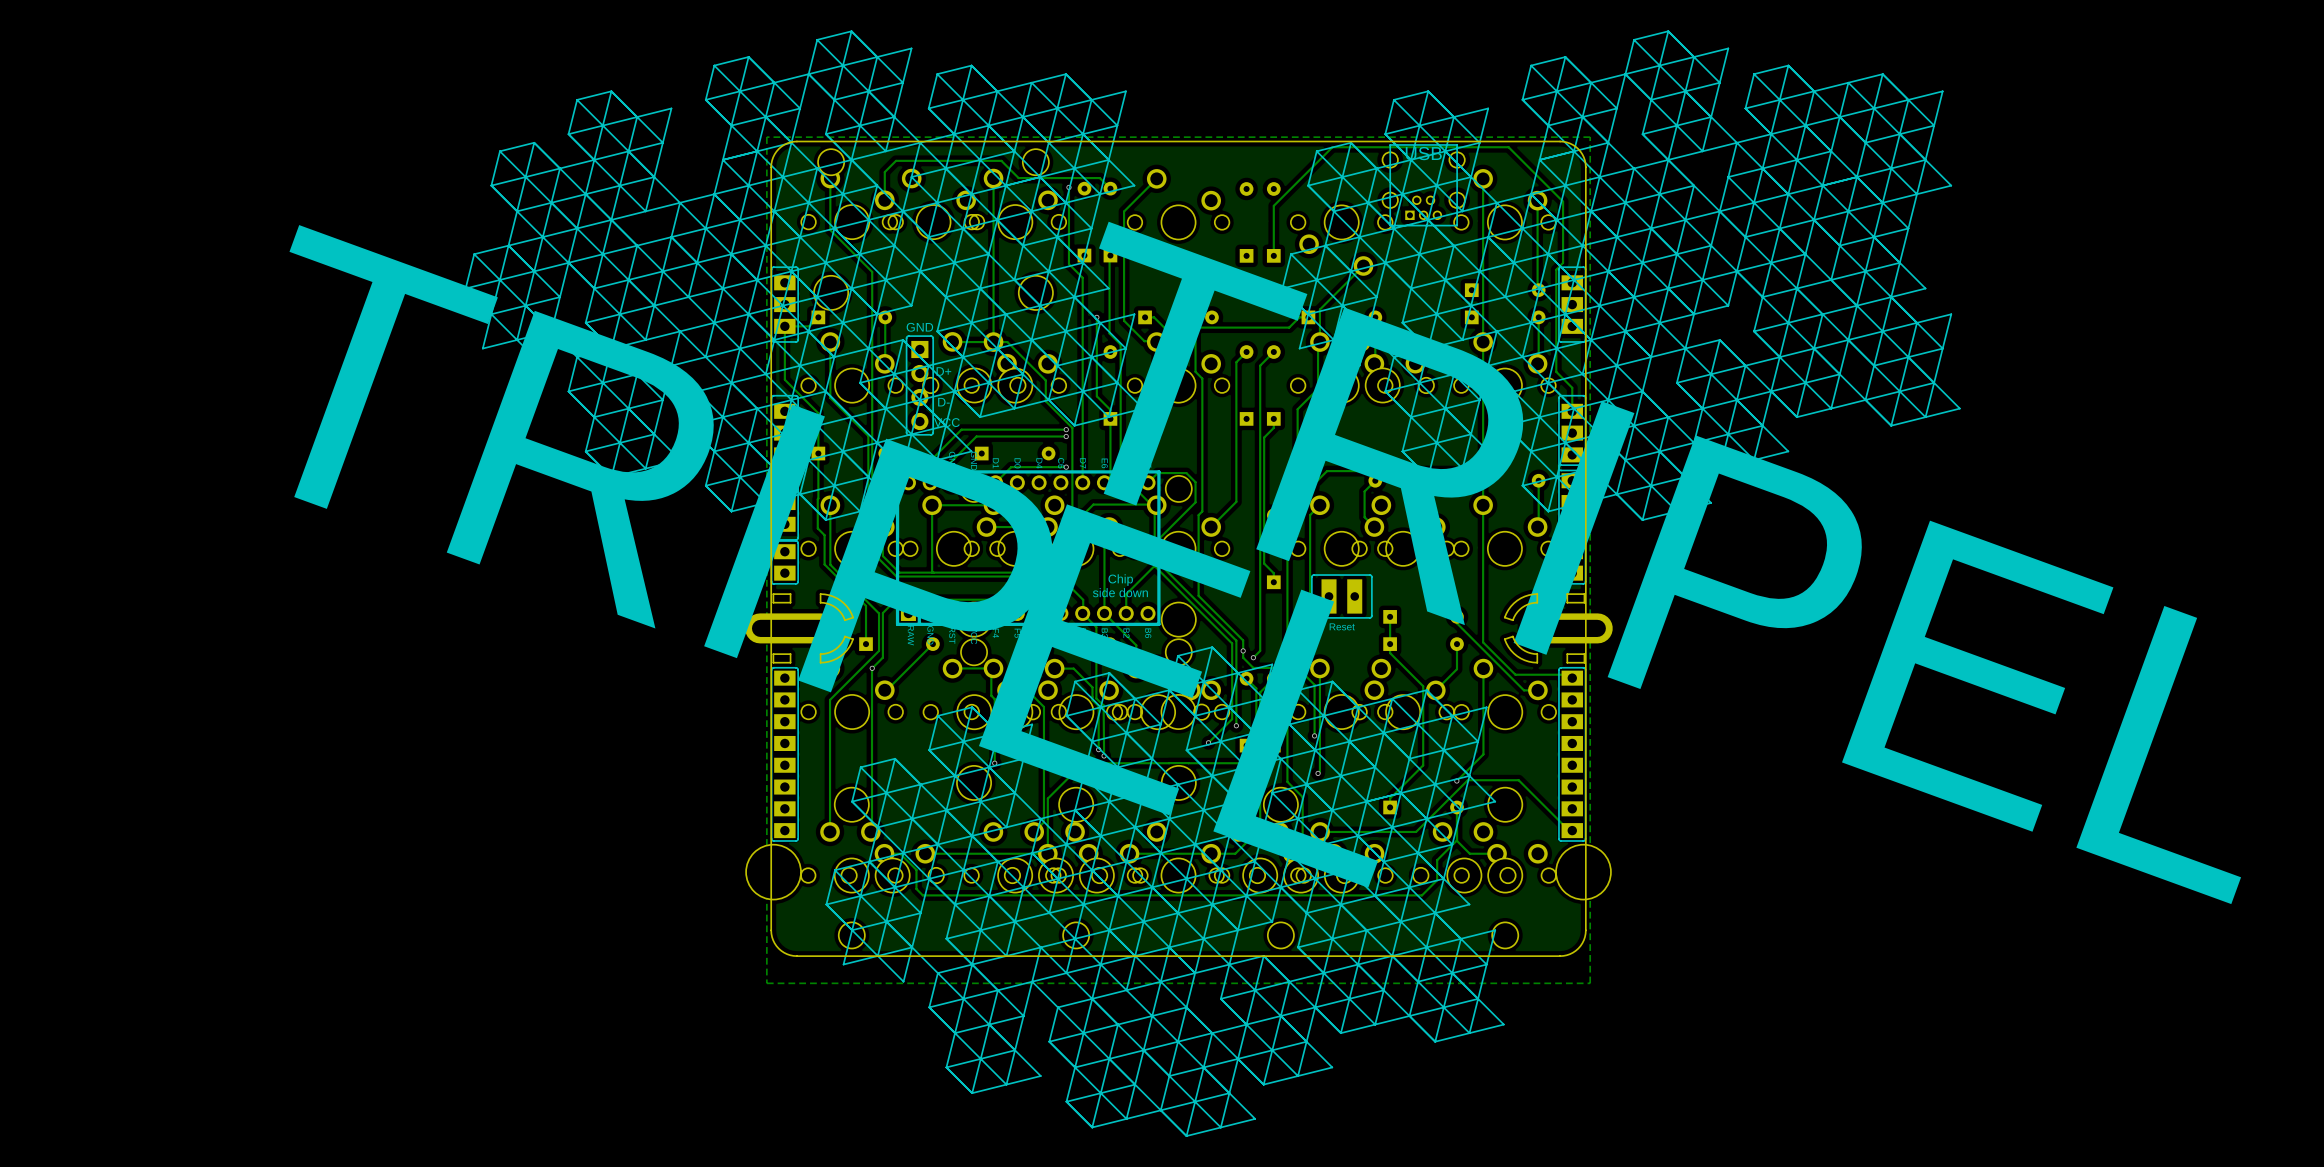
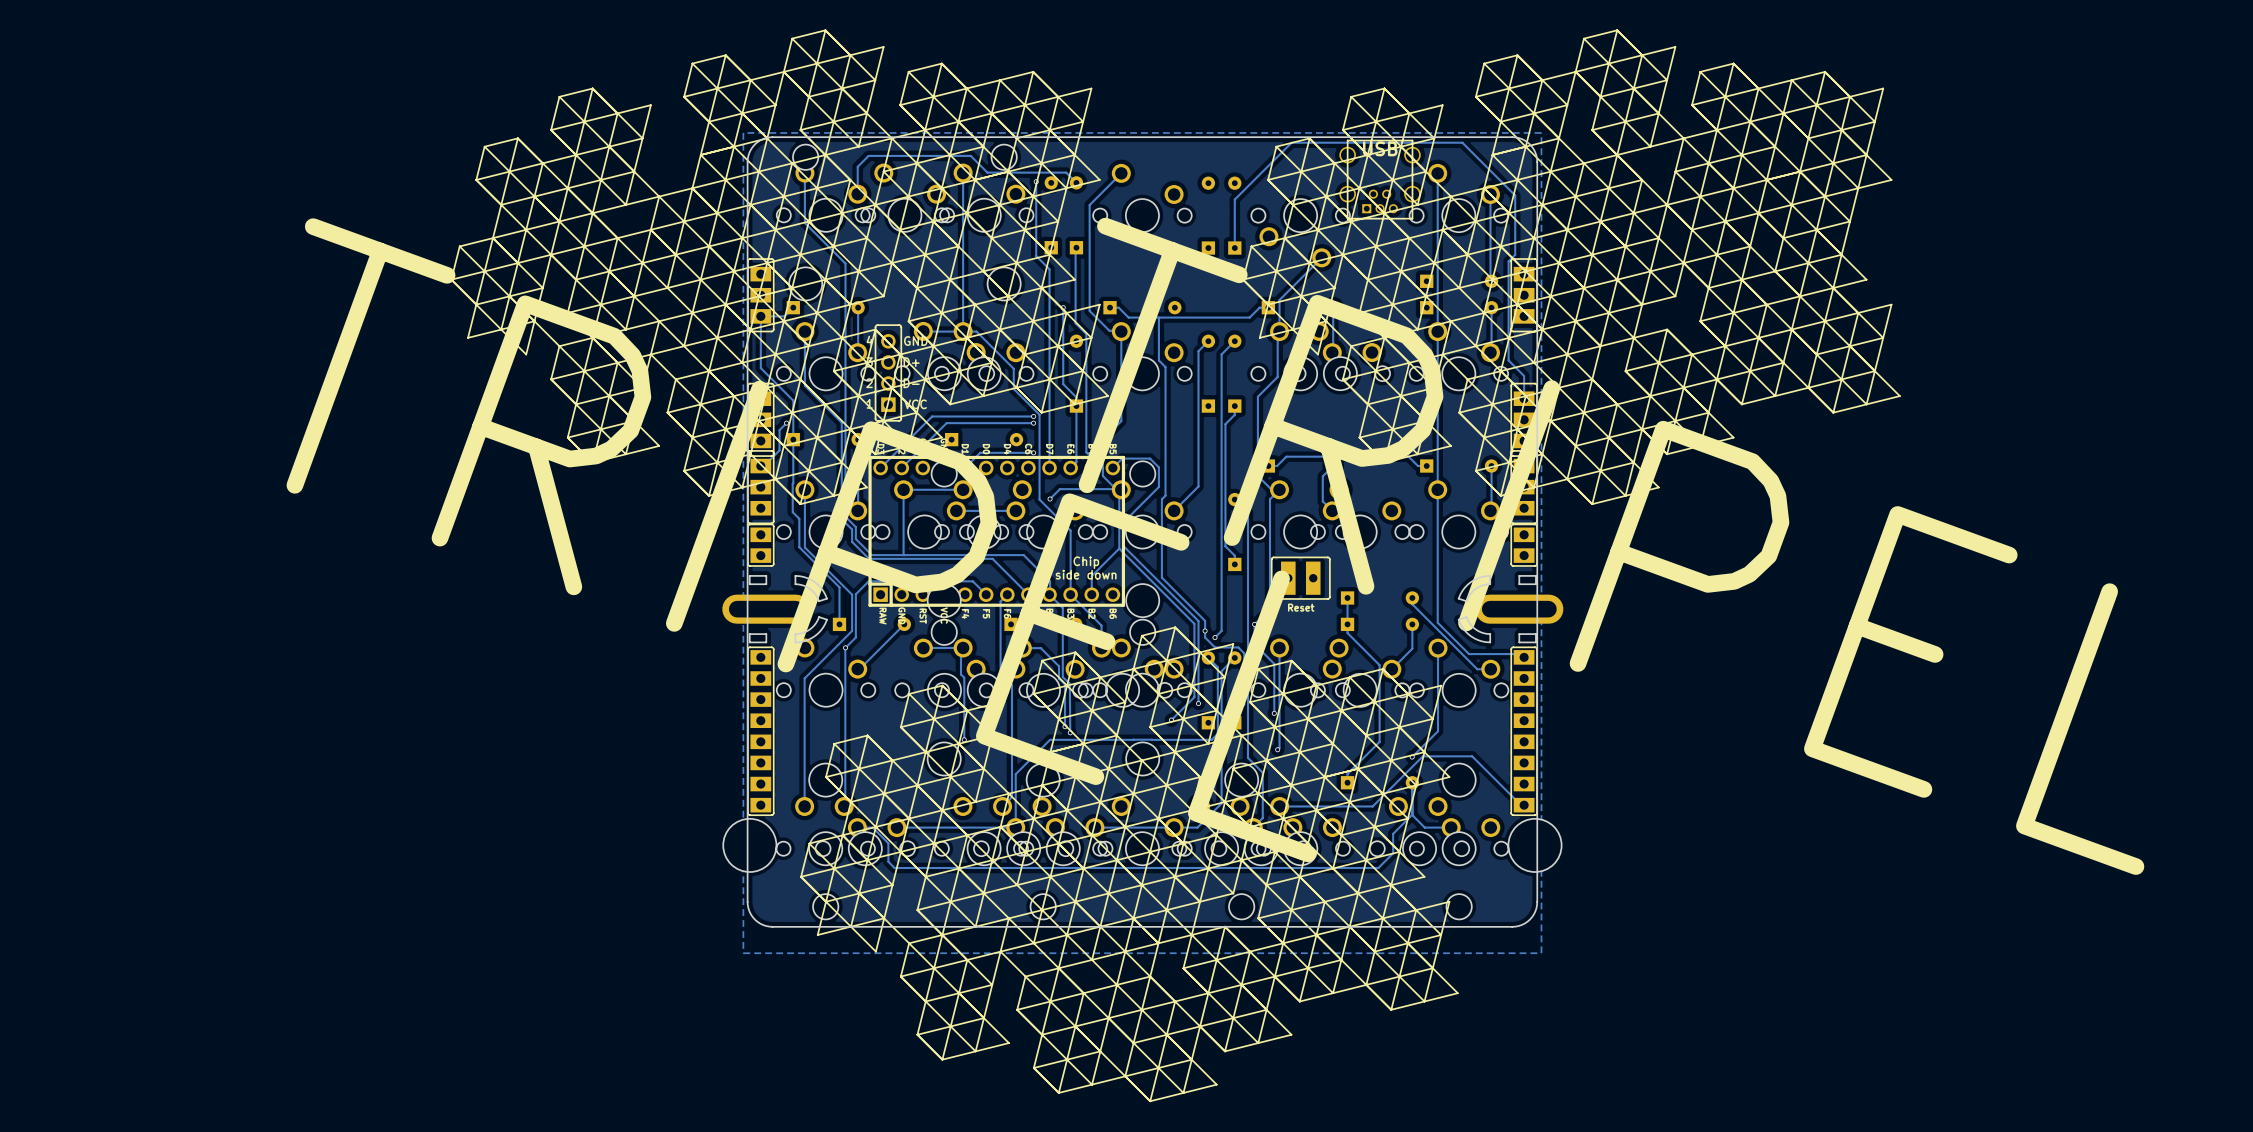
part footprint: [905, 335, 935, 436] -> [874, 324, 903, 422]

